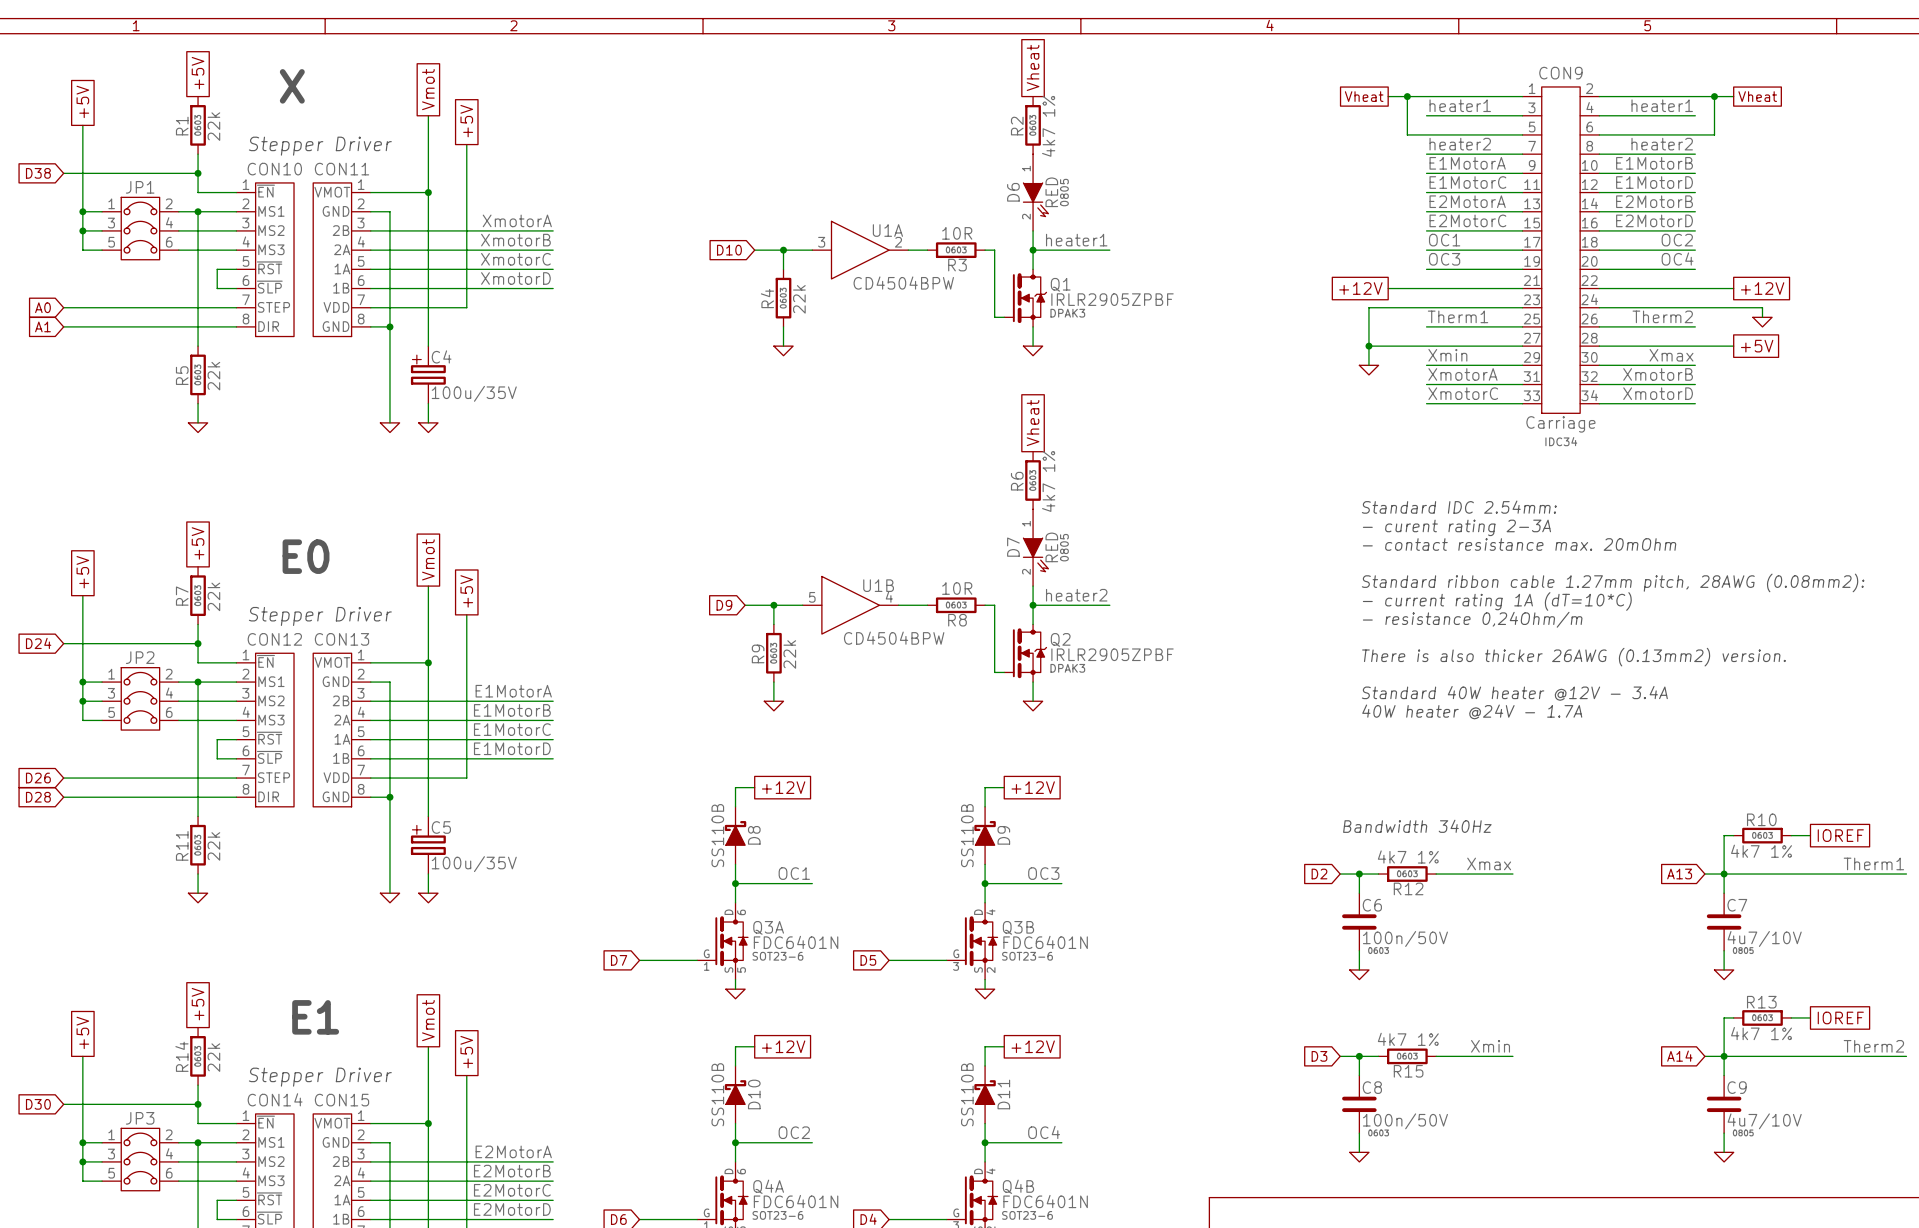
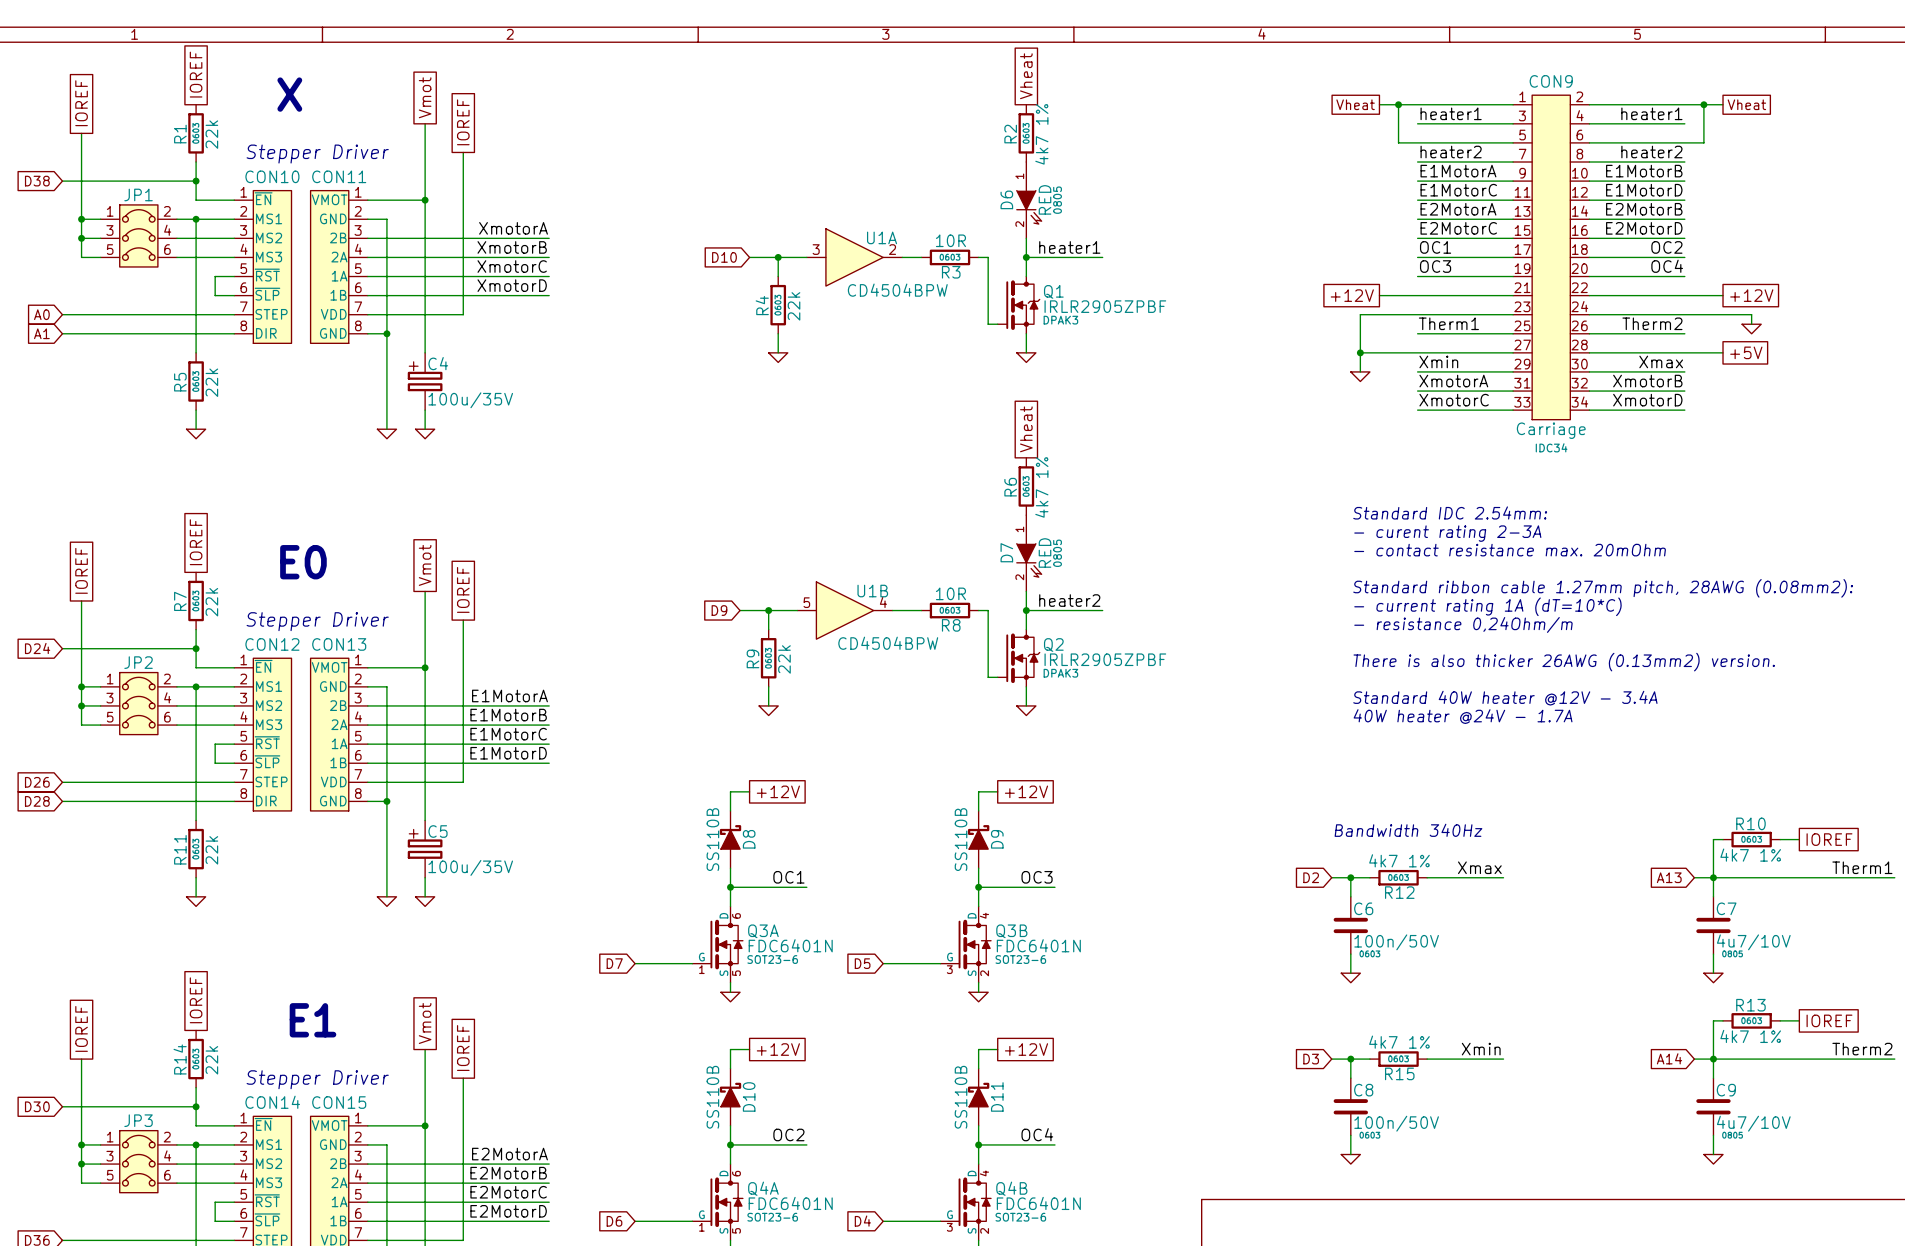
global label: +5V (198, 73) -> IOREF (196, 74)
global label: +5V (82, 101) -> IOREF (81, 103)
global label: +5V (466, 121) -> IOREF (463, 122)
global label: +5V (198, 543) -> IOREF (196, 542)
global label: +5V (82, 572) -> IOREF (81, 570)
global label: +5V (466, 591) -> IOREF (463, 589)
global label: +5V (198, 1004) -> IOREF (196, 1000)
global label: +5V (82, 1032) -> IOREF (81, 1028)
global label: +5V (466, 1052) -> IOREF (463, 1048)

